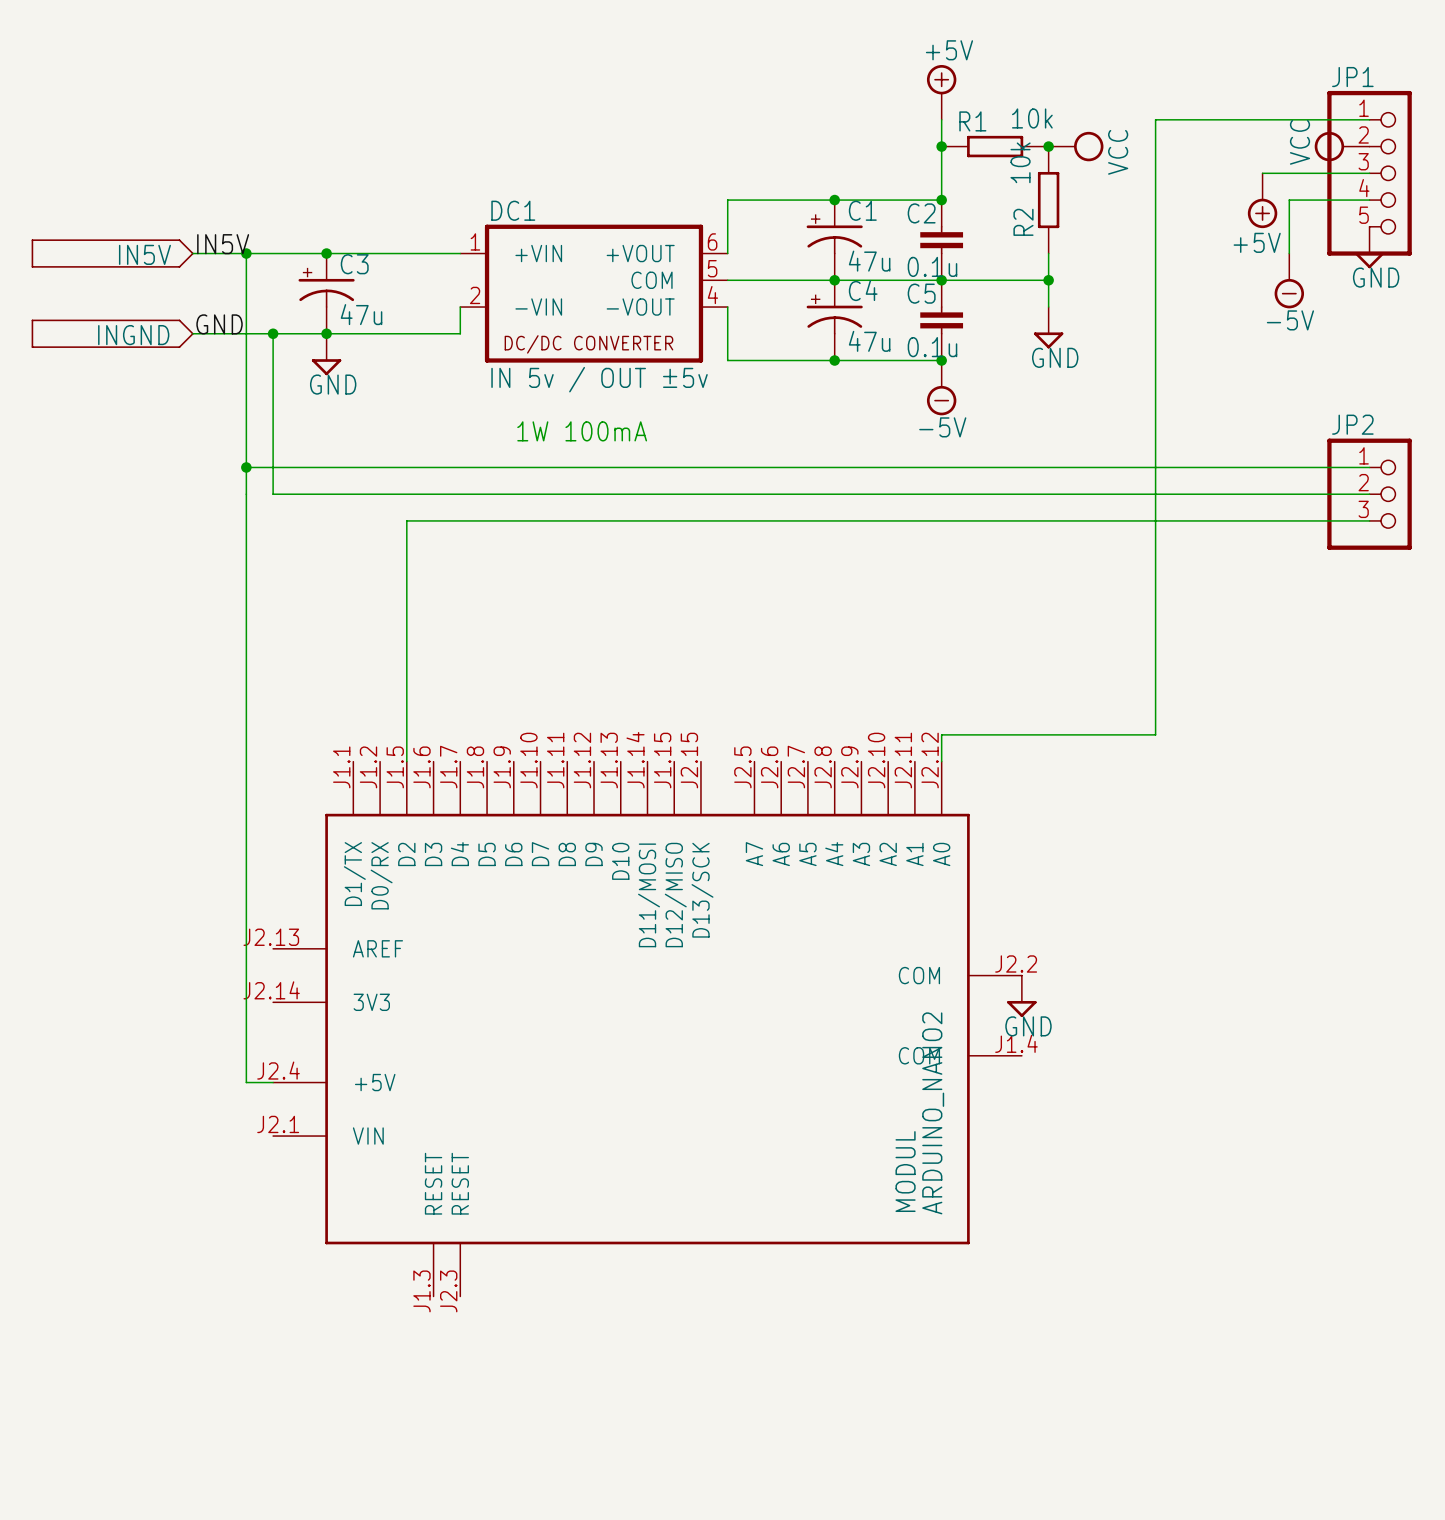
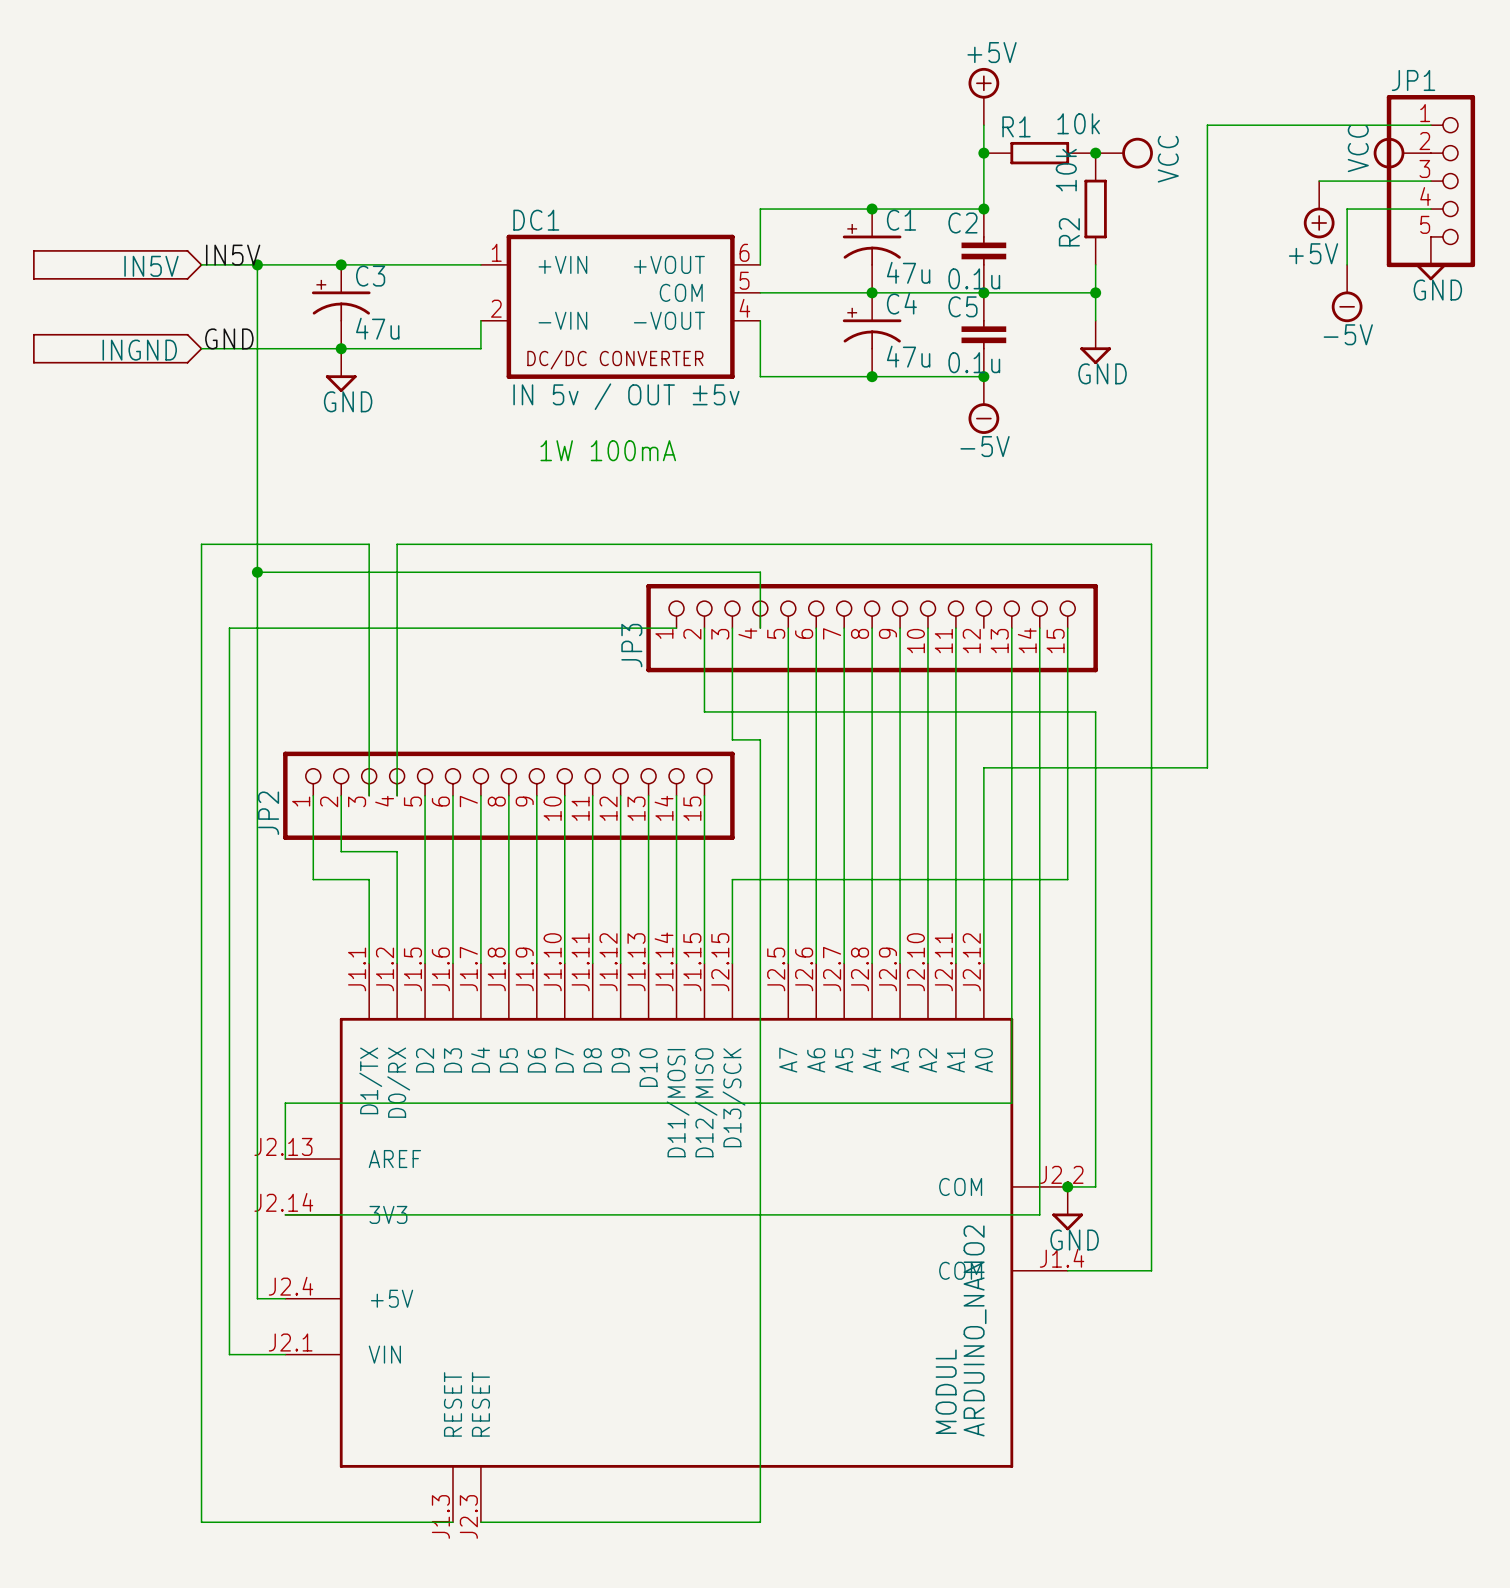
wire: (273, 333) (273, 494) (1369, 494) -> none
junction: (273, 333) -> none
JP2 name position: JP2 (1352, 424) -> JP2 (268, 813)
JP2 symbol: [1327, 438, 1412, 550] -> [283, 751, 735, 840]
wire: (246, 467) (1369, 467) -> none
junction: (246, 467) -> none
wire: (406, 520) (406, 761) -> (425, 544) (397, 544) (397, 795)
wire: (1102, 520) (1369, 520) -> (1151, 544) (1151, 1270) (1067, 1270)
wire: none -> (257, 572) (760, 572) (760, 628)
junction: none -> (257, 572)
wire: none -> (676, 628) (229, 628) (229, 1354) (285, 1354)
wire: none -> (704, 628) (704, 711) (1095, 711) (1095, 1186) (1067, 1186)
wire: none -> (732, 628) (732, 739) (760, 739) (760, 1522) (480, 1522)
wire: none -> (788, 628) (788, 963)
wire: none -> (816, 628) (816, 963)
wire: none -> (844, 628) (844, 963)
wire: none -> (872, 628) (872, 963)
JP3: none -> (872, 628)
wire: none -> (900, 628) (900, 963)
wire: none -> (927, 628) (927, 963)
wire: none -> (955, 628) (955, 963)
wire: none -> (1011, 628) (1011, 1103) (285, 1103) (285, 1159)
wire: none -> (1039, 628) (1039, 1214) (285, 1214)
wire: none -> (1067, 628) (1067, 879) (732, 879) (732, 963)
wire: none -> (313, 795) (313, 879) (369, 879) (369, 963)
wire: none -> (341, 795) (341, 851) (397, 851) (397, 963)
wire: none -> (369, 795) (369, 544) (201, 544) (201, 1522) (452, 1522)
wire: none -> (425, 795) (425, 963)
wire: none -> (452, 795) (452, 963)
wire: none -> (480, 795) (480, 963)
wire: none -> (508, 795) (508, 963)
wire: none -> (536, 795) (536, 963)
wire: none -> (564, 795) (564, 963)
wire: none -> (592, 795) (592, 963)
wire: none -> (620, 795) (620, 963)
wire: none -> (648, 795) (648, 963)
wire: none -> (676, 795) (676, 963)
wire: none -> (704, 795) (704, 963)
wire: none -> (983, 795) (983, 963)
power symbol position: GND (1021, 996) -> GND (1067, 1208)
MODUL position: (647, 1029) -> (676, 1242)
wire: (246, 1082) (273, 1082) -> (257, 1131) (257, 1298) (285, 1298)
junction: none -> (1067, 1186)

